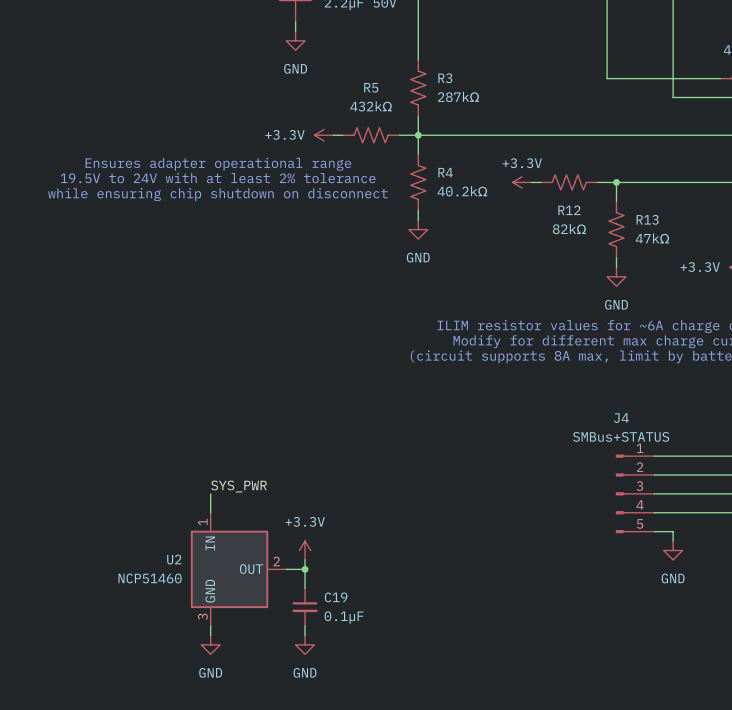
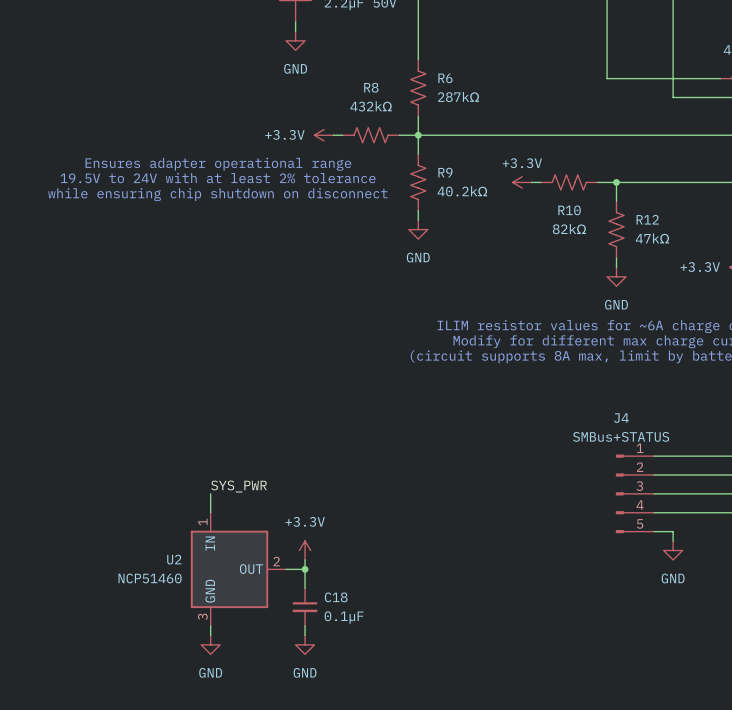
R3 name: R3 (445, 78) -> R6 (445, 78)
R5 name: R5 (371, 87) -> R8 (371, 87)
R4 name: R4 (445, 172) -> R9 (445, 172)
R12 name: R12 (569, 210) -> R10 (569, 210)
R13 name: R13 (647, 219) -> R12 (647, 219)
C19 name: C19 (336, 597) -> C18 (336, 597)

